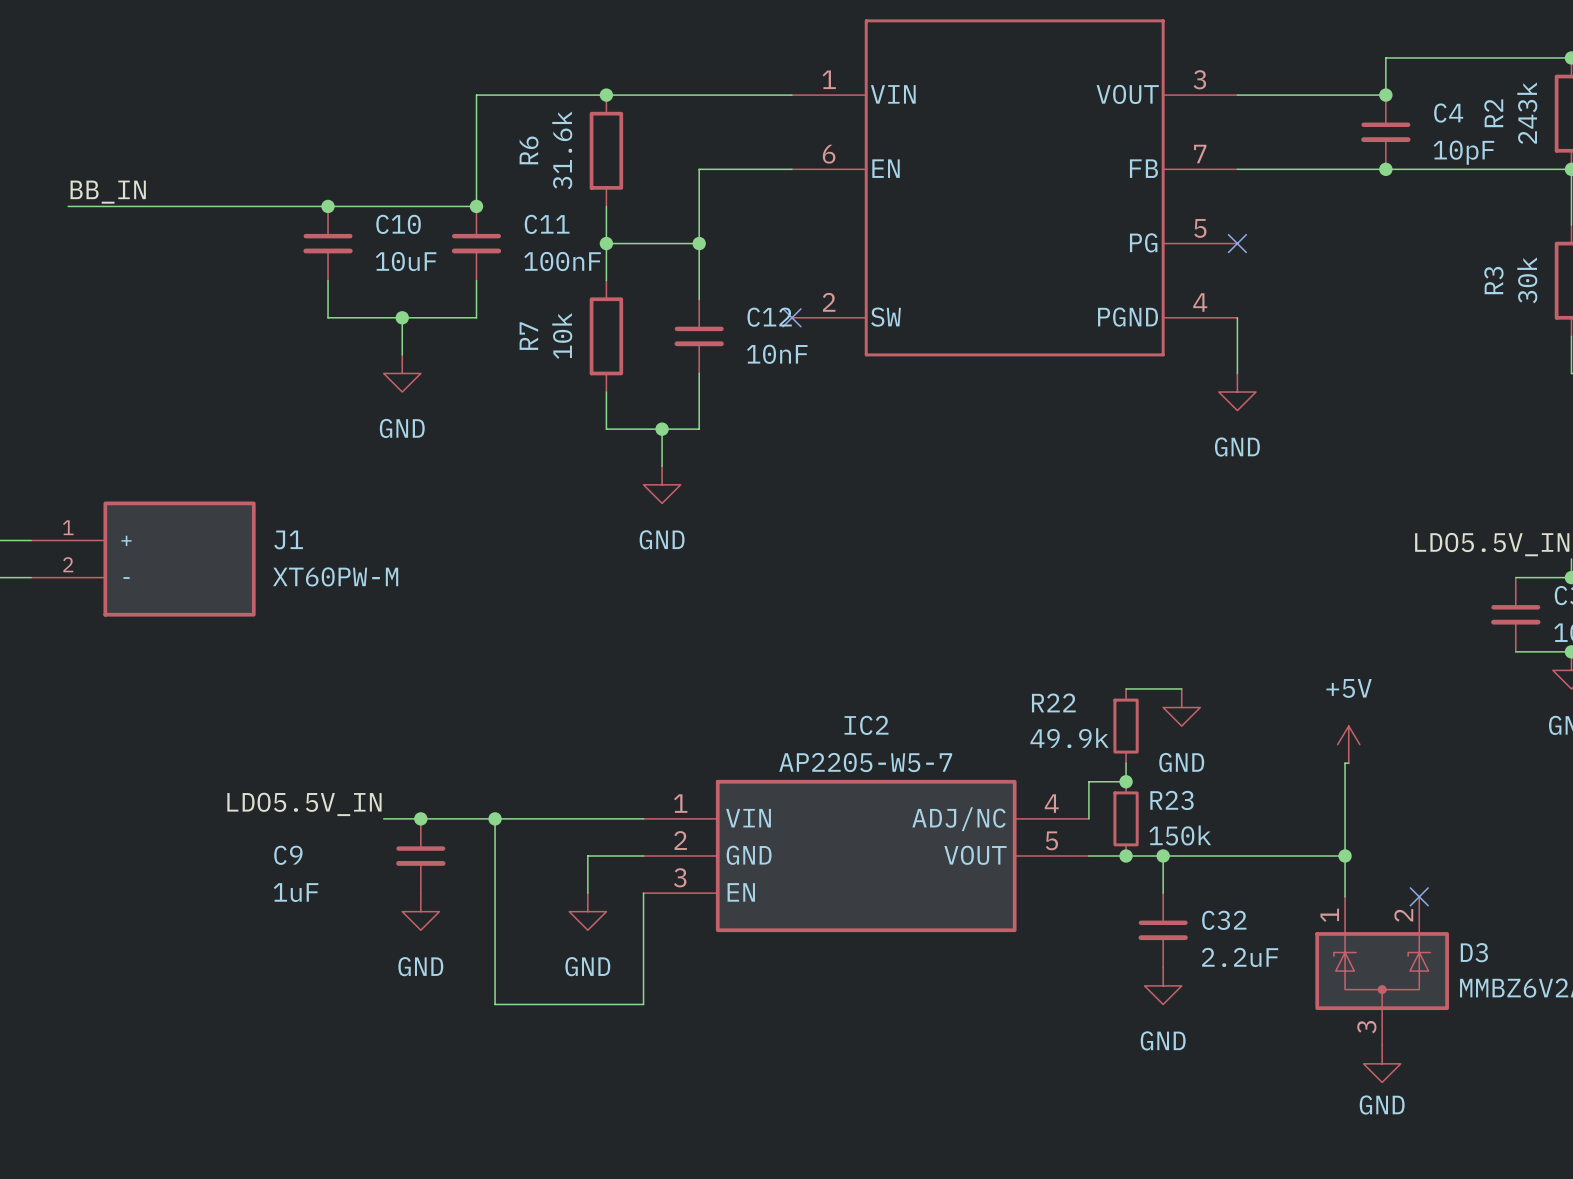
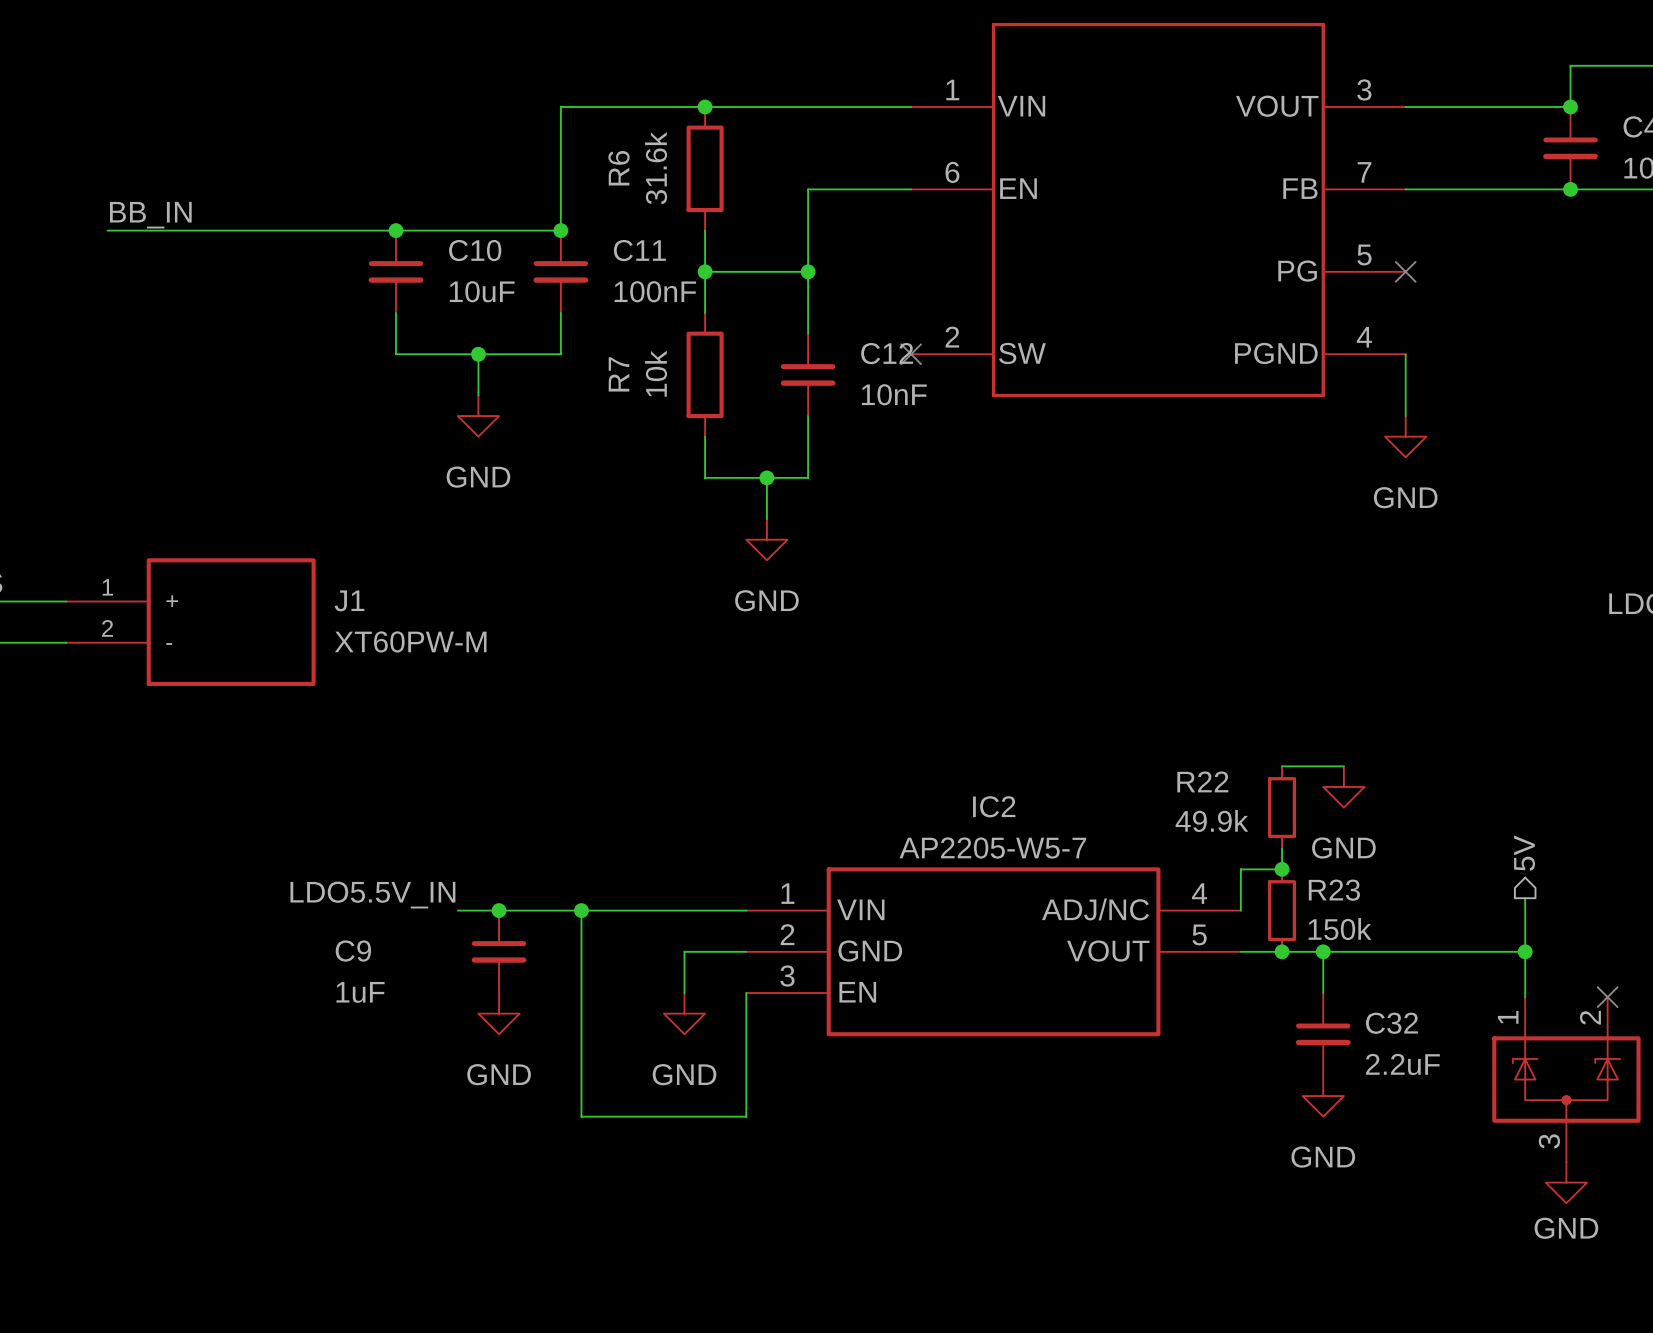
power symbol: +5V (1348, 744) -> none
wire: (1348, 763) (1345, 763) (1345, 807) -> none
hierarchical label: none -> 5V (1524, 853)

